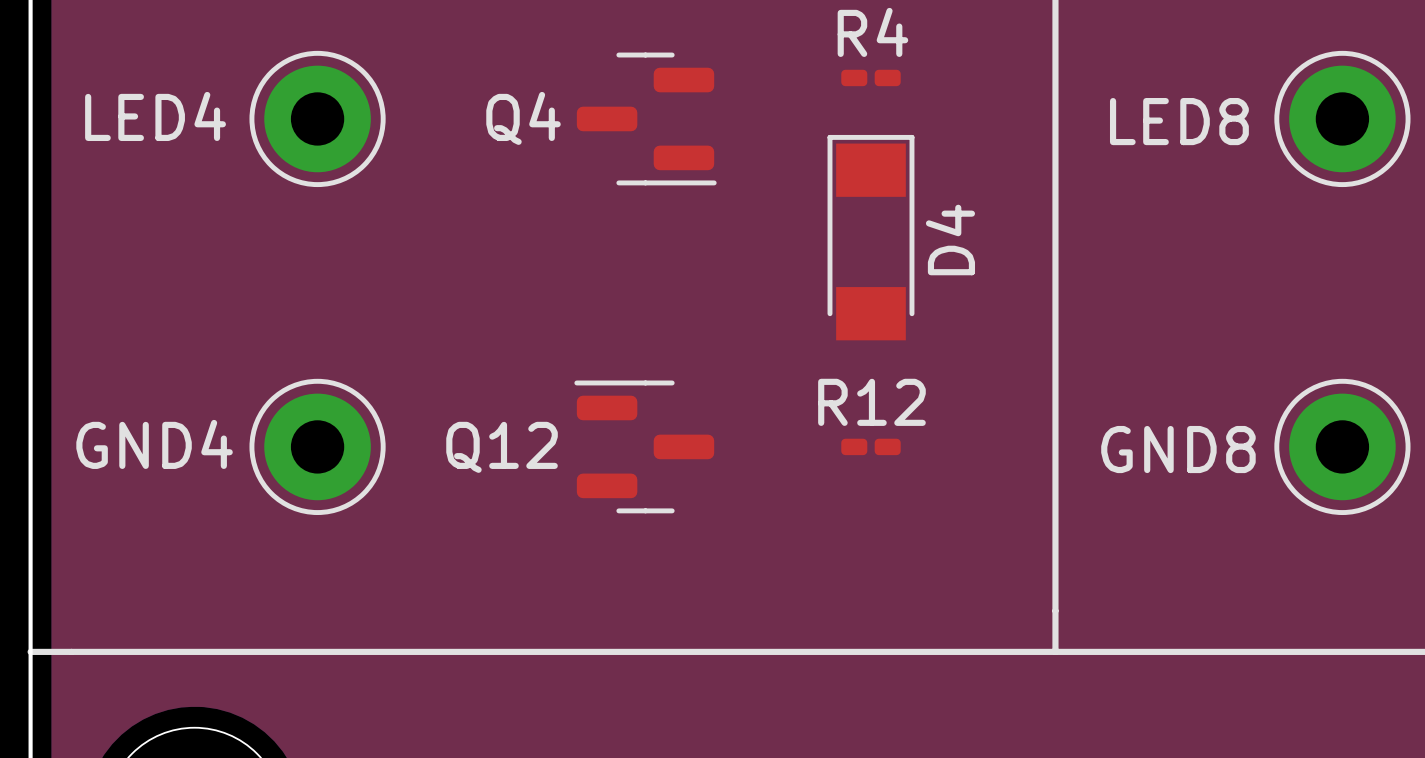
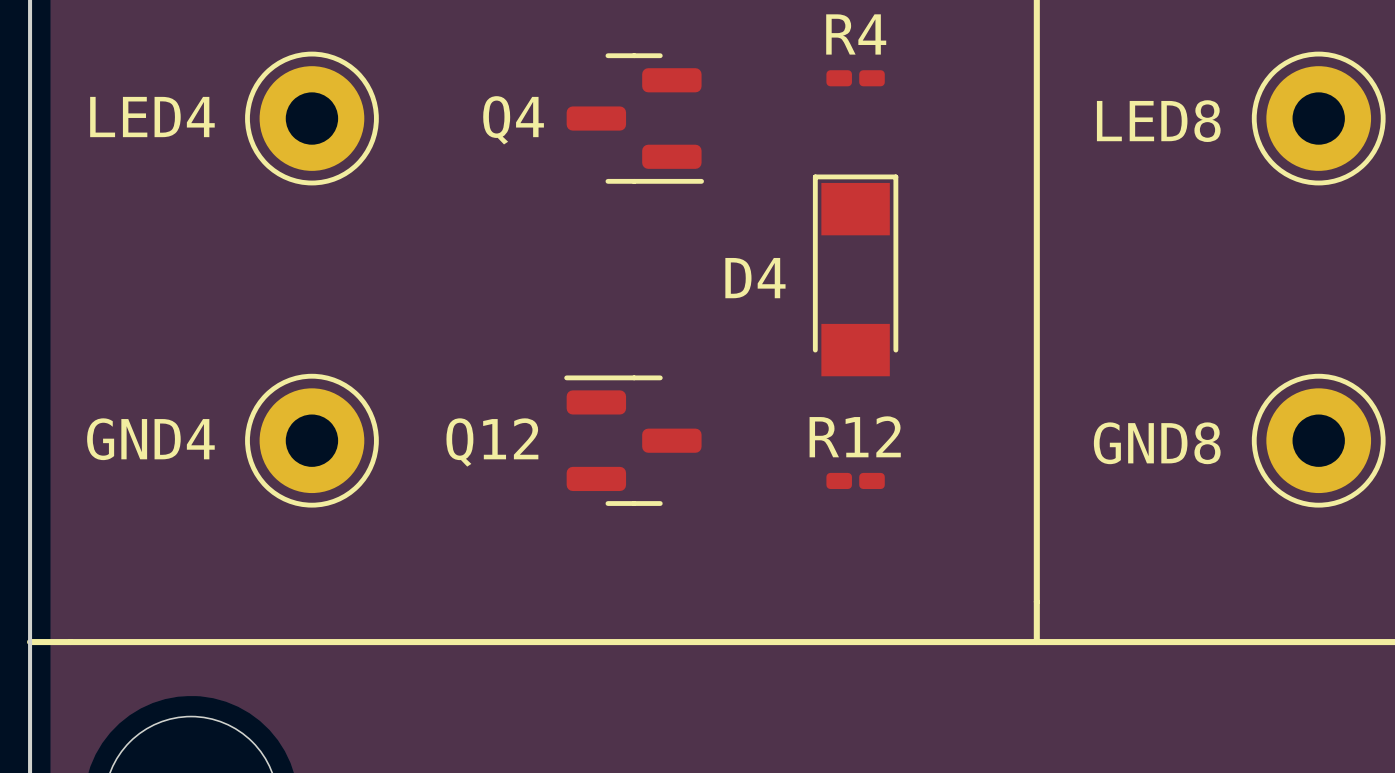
D4 position: (870, 237) -> (855, 275)
D4 name rotation: 0° (950, 240) -> 90° clockwise (755, 278)
D4 name position: D4 (950, 240) -> D4 (755, 278)
R12 position: (870, 446) -> (855, 480)

